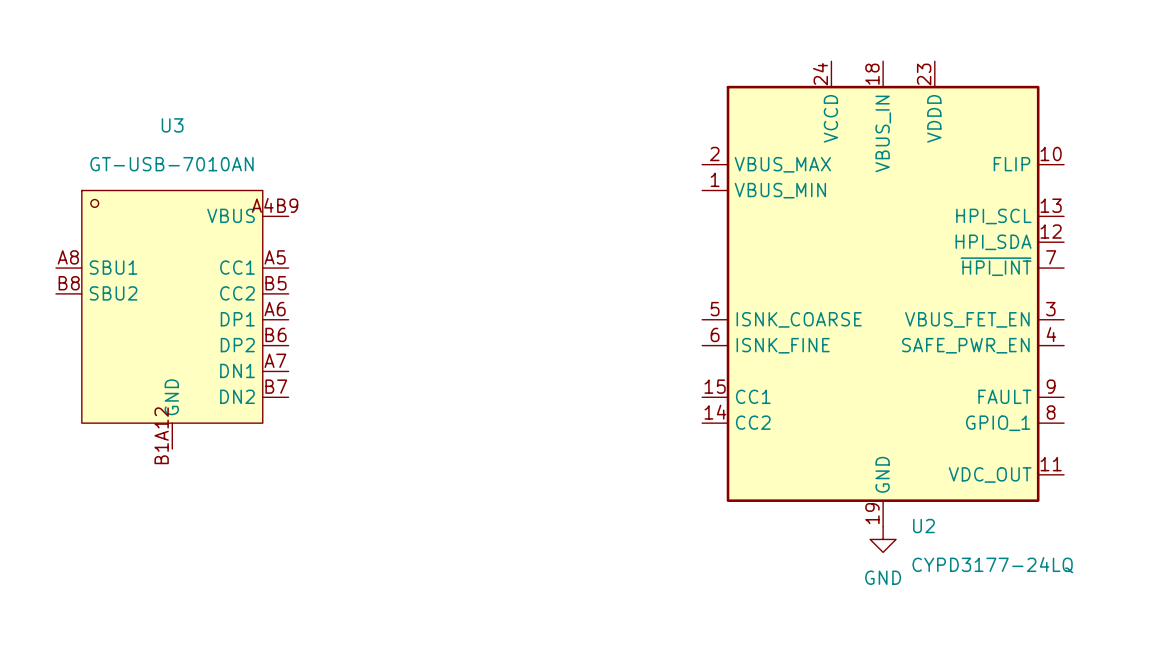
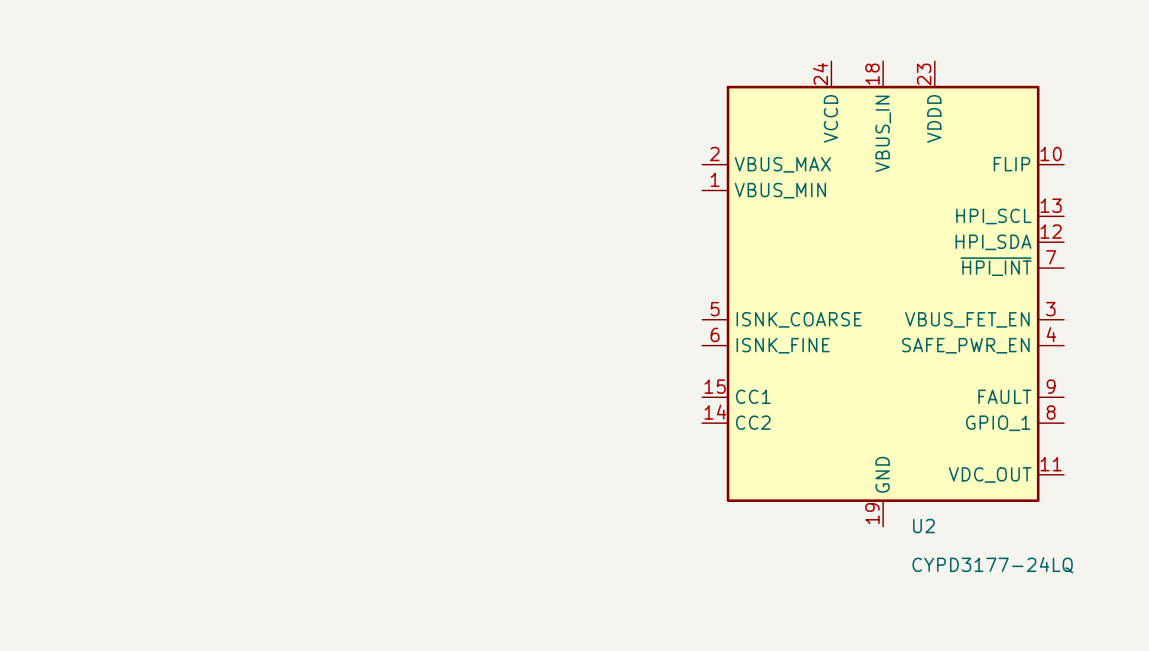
U3: GT-USB-7010AN (172, 319) -> none
power symbol: GND (883, 539) -> none

